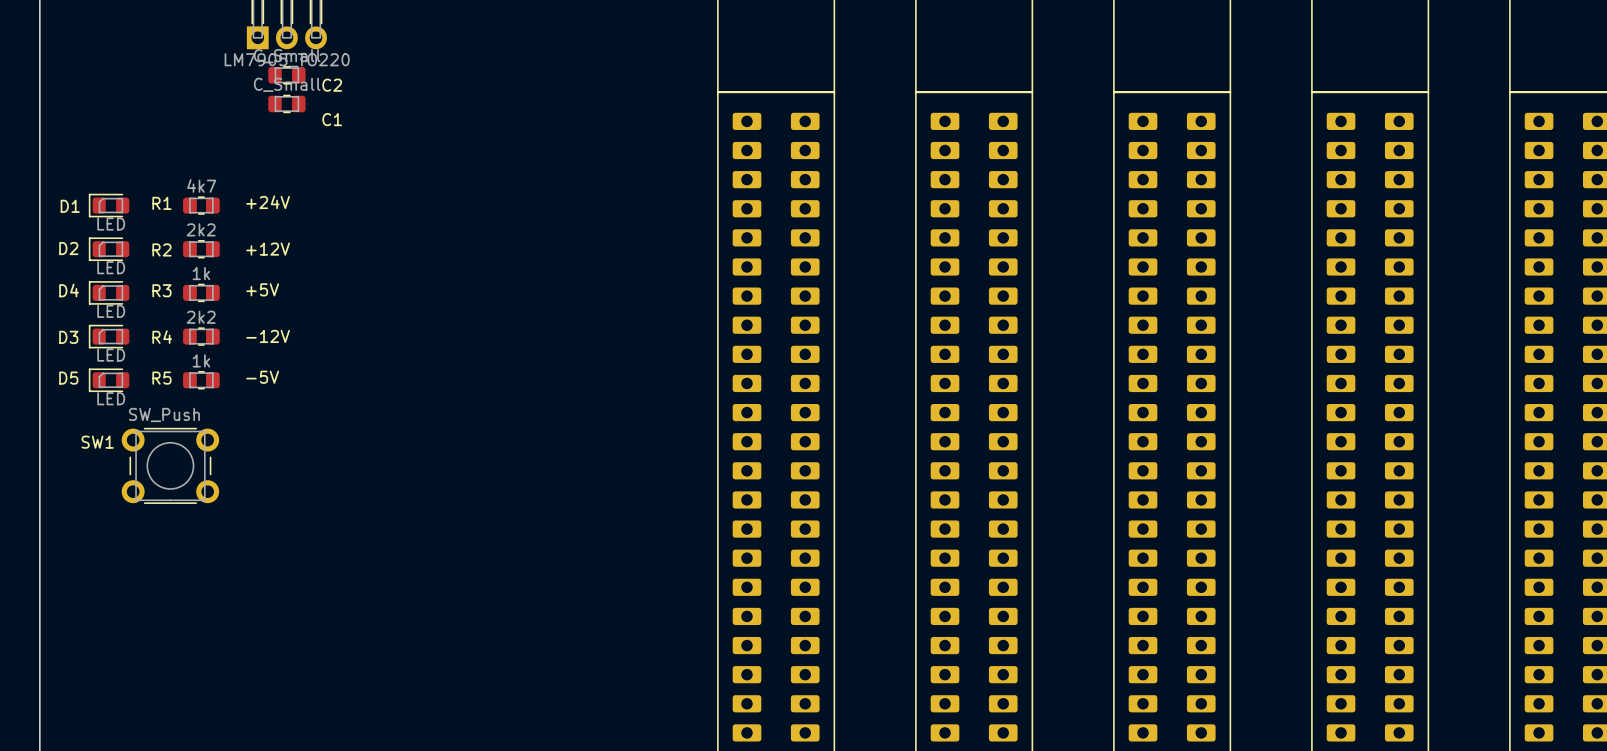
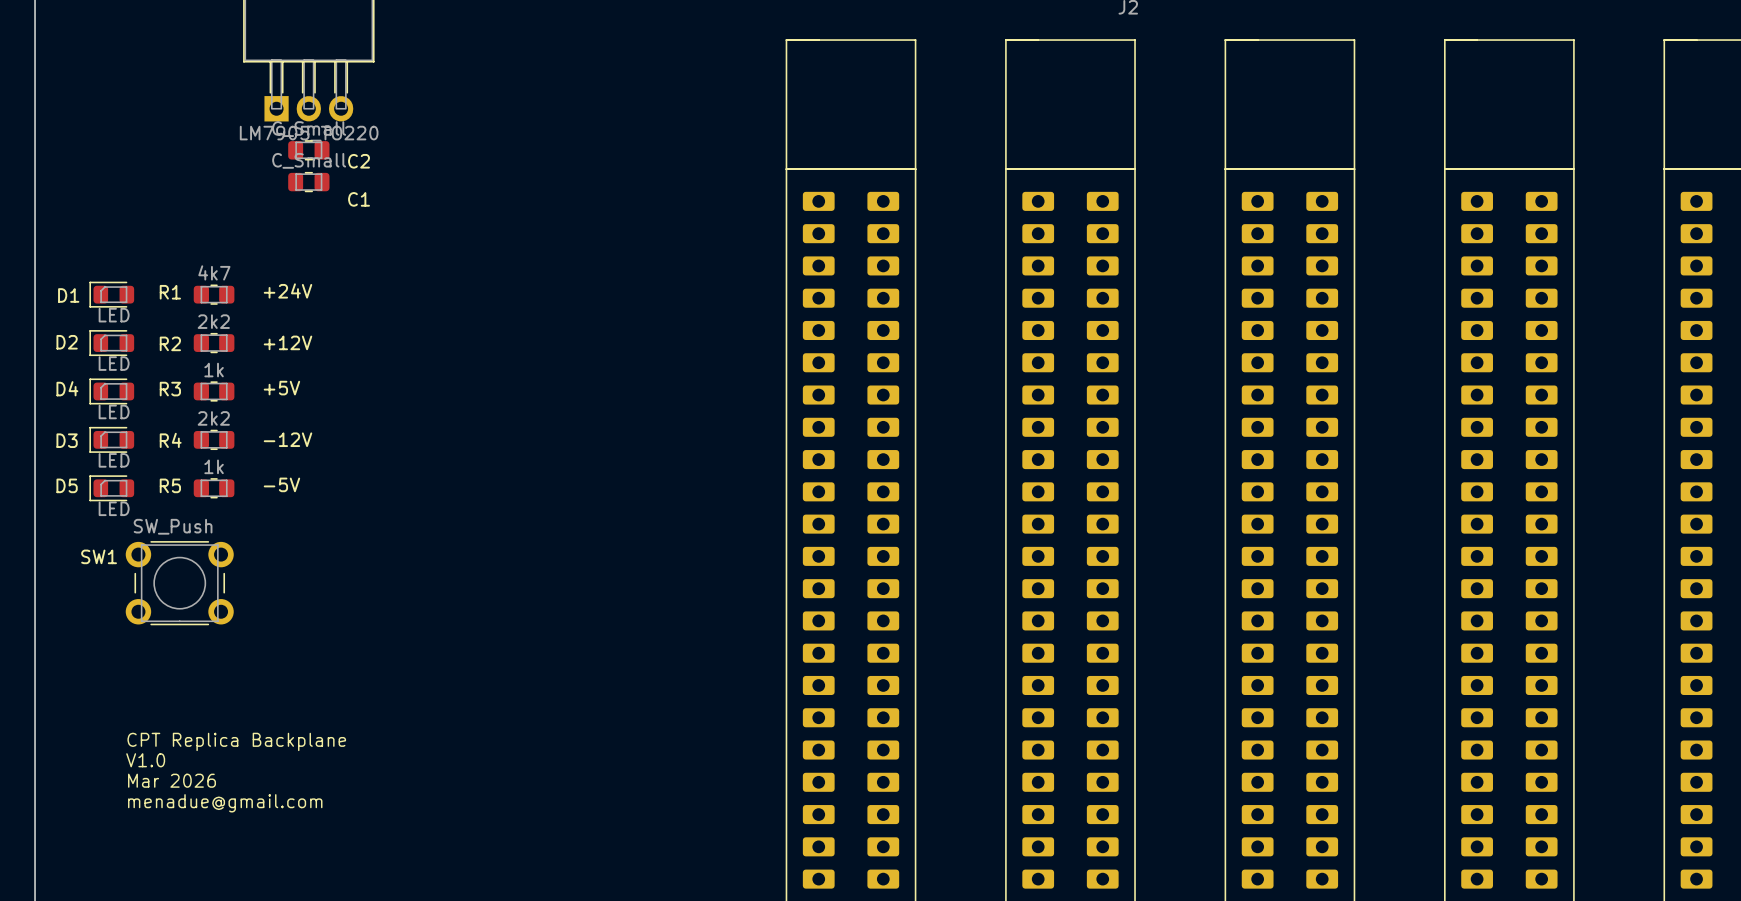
text: none -> CPT Replica Backplane (236, 741)
text: none -> V1.0 (145, 760)
text: none -> Mar 2026 (172, 780)
text: none -> menadue@gmail.com (225, 803)

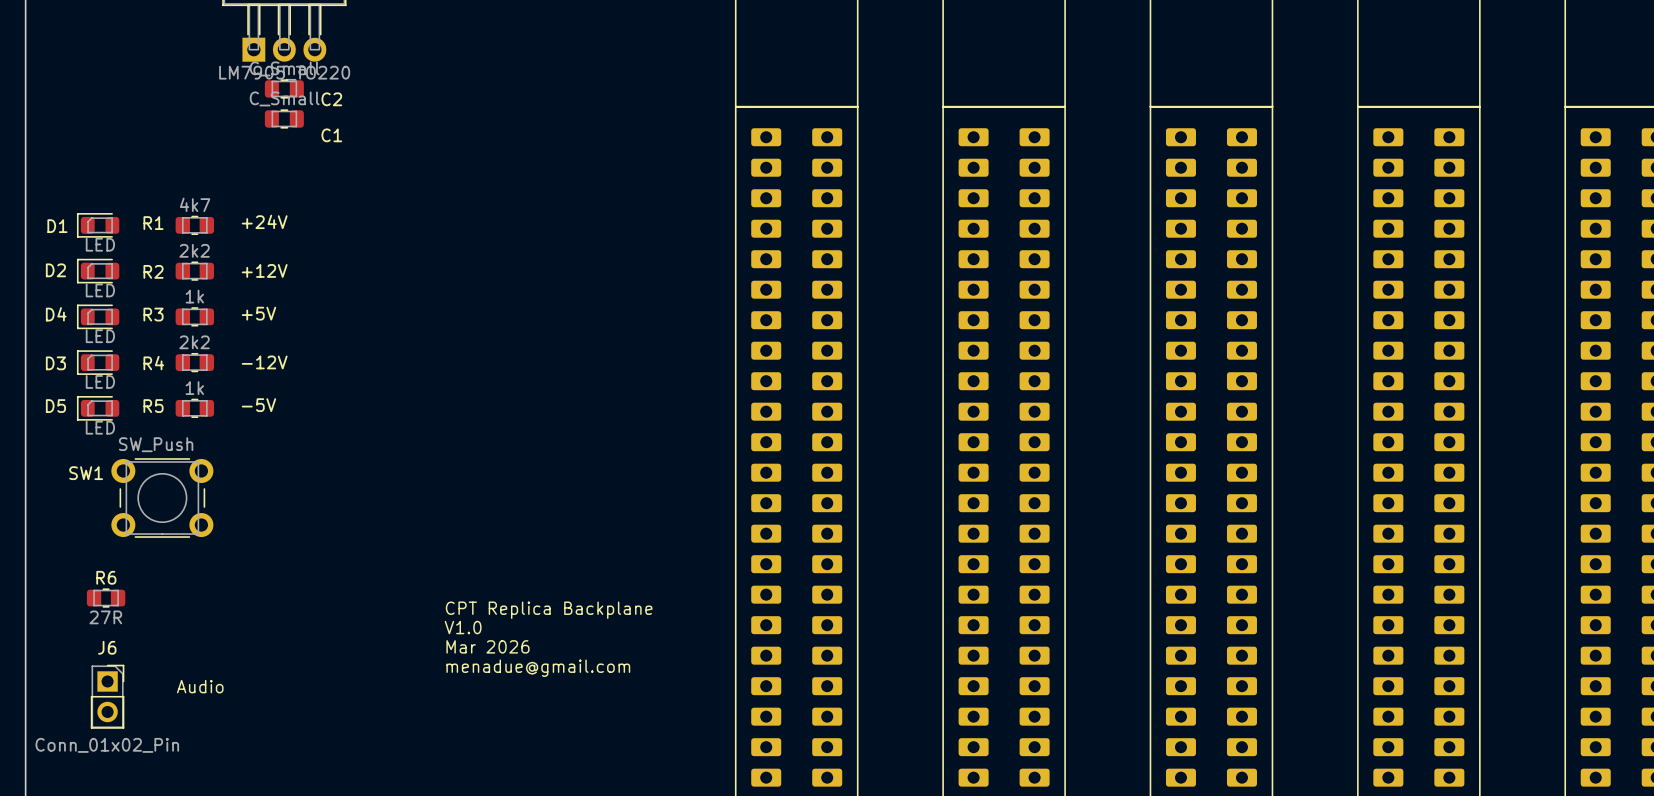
R6: none -> 27R (106, 598)
text: none -> CPT Replica Backplane (549, 610)
text: none -> V1.0 (463, 627)
text: none -> Mar 2026 (487, 646)
text: CPT Replica Backplane (236, 741) -> none
text: V1.0 (145, 760) -> none
text: none -> menadue@gmail.com (538, 668)
text: Mar 2026 (172, 780) -> none
text: none -> Audio (200, 686)
J6: none -> Conn_01x02_Pin (107, 696)
text: menadue@gmail.com (225, 803) -> none

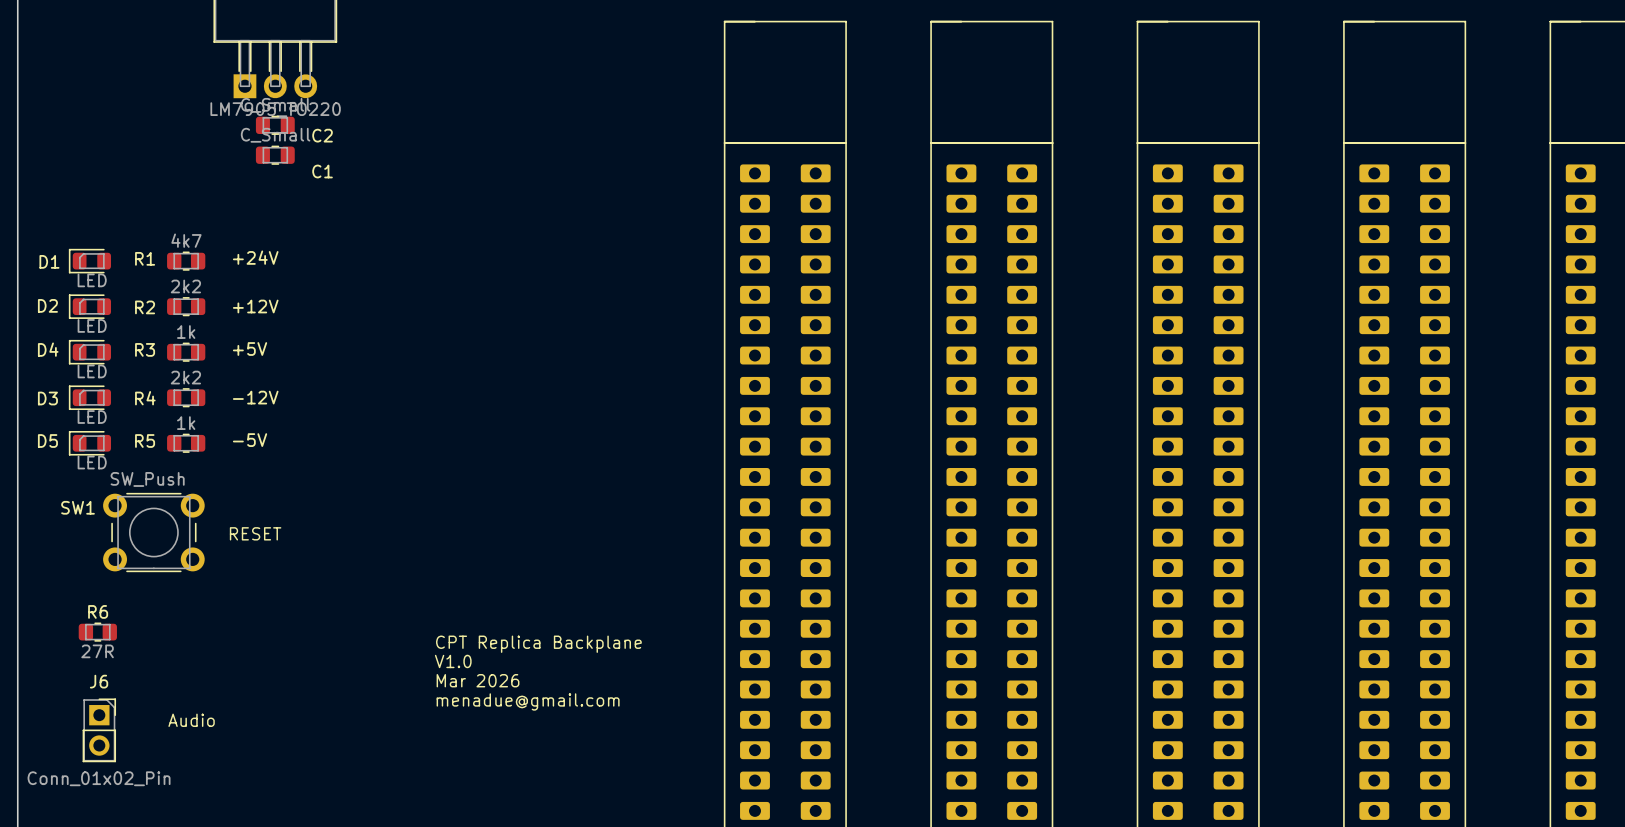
text: none -> RESET (255, 533)

